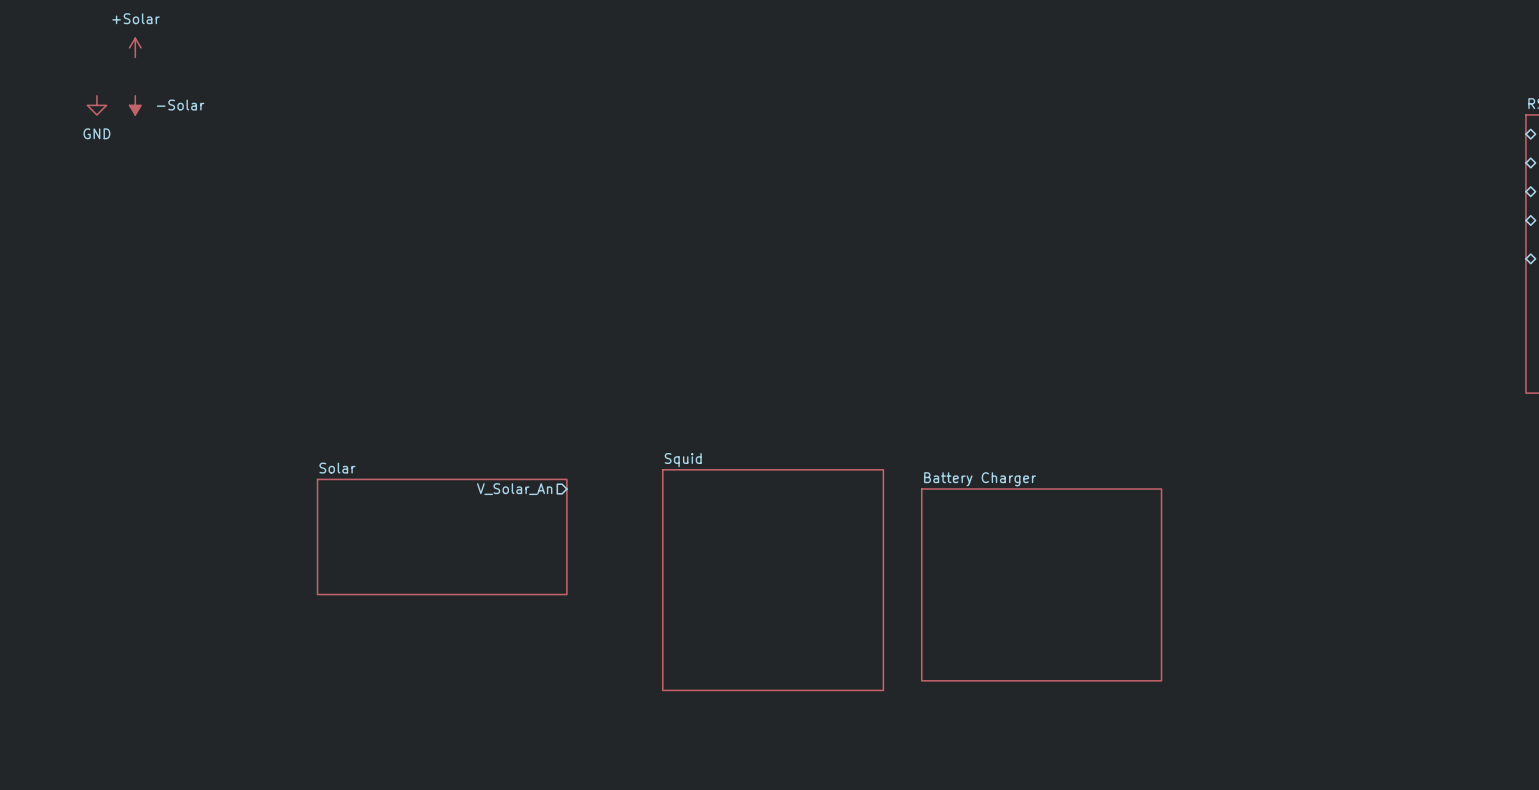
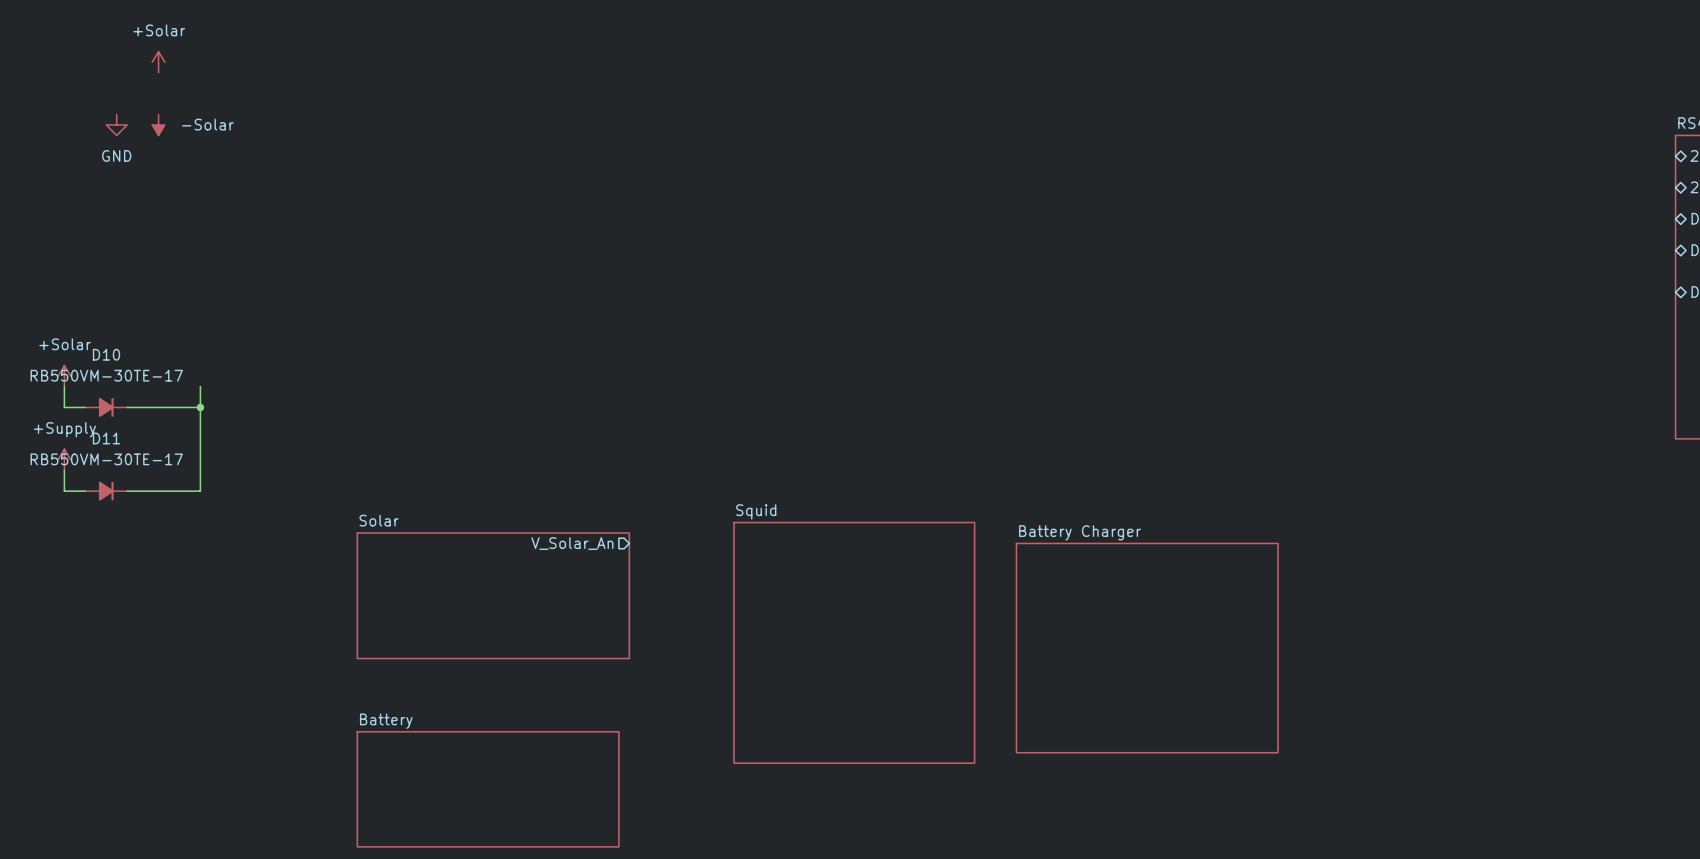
power symbol: none -> +Solar (64, 376)
wire: none -> (64, 386) (64, 407) (85, 407)
wire: none -> (200, 386) (200, 491) (127, 491)
D10: none -> RB550VM-30TE-17 (106, 407)
wire: none -> (127, 407) (200, 407)
junction: none -> (200, 407)
power symbol: none -> +Supply (64, 459)
wire: none -> (64, 470) (64, 491) (85, 491)
D11: none -> RB550VM-30TE-17 (106, 491)
sheet Battery: none -> (488, 789)

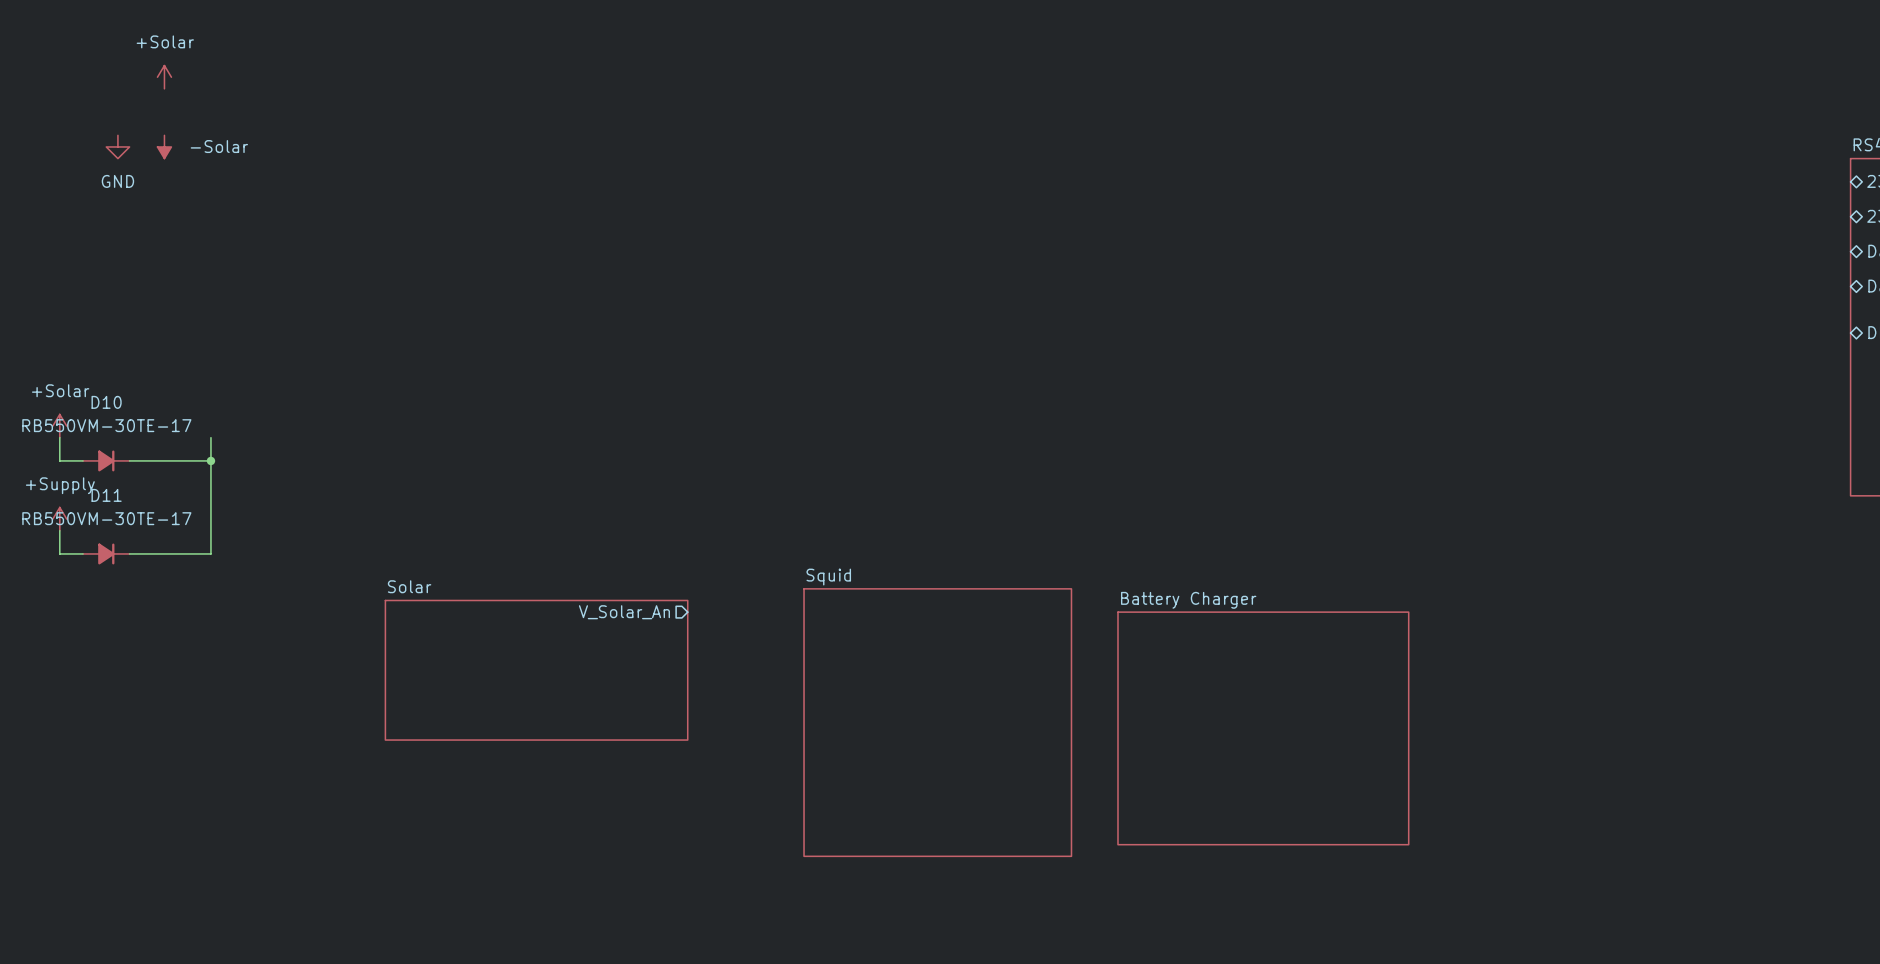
sheet Battery: (488, 789) -> none

